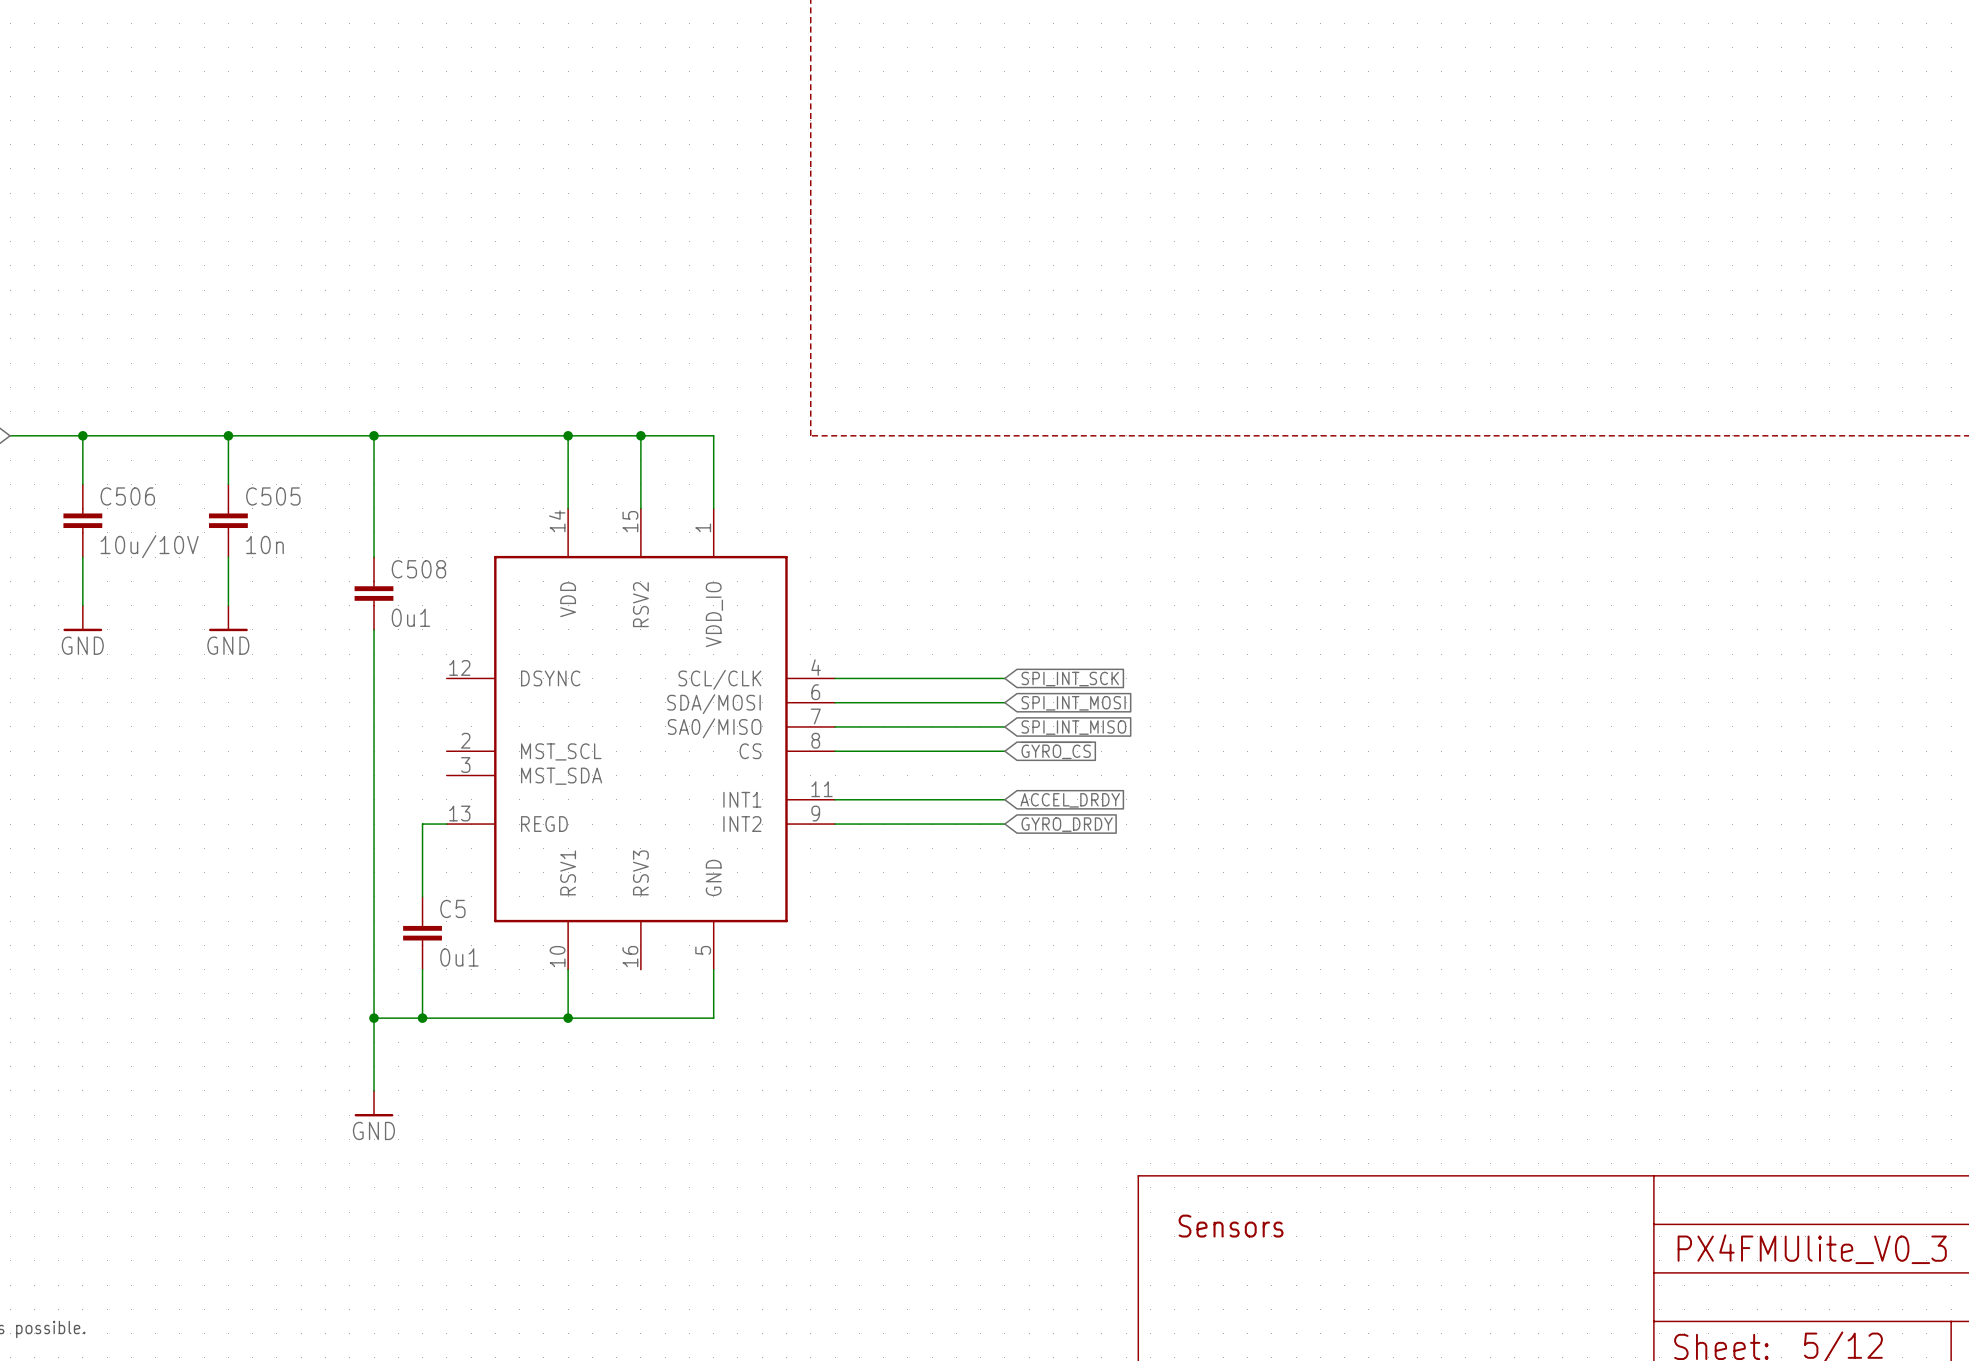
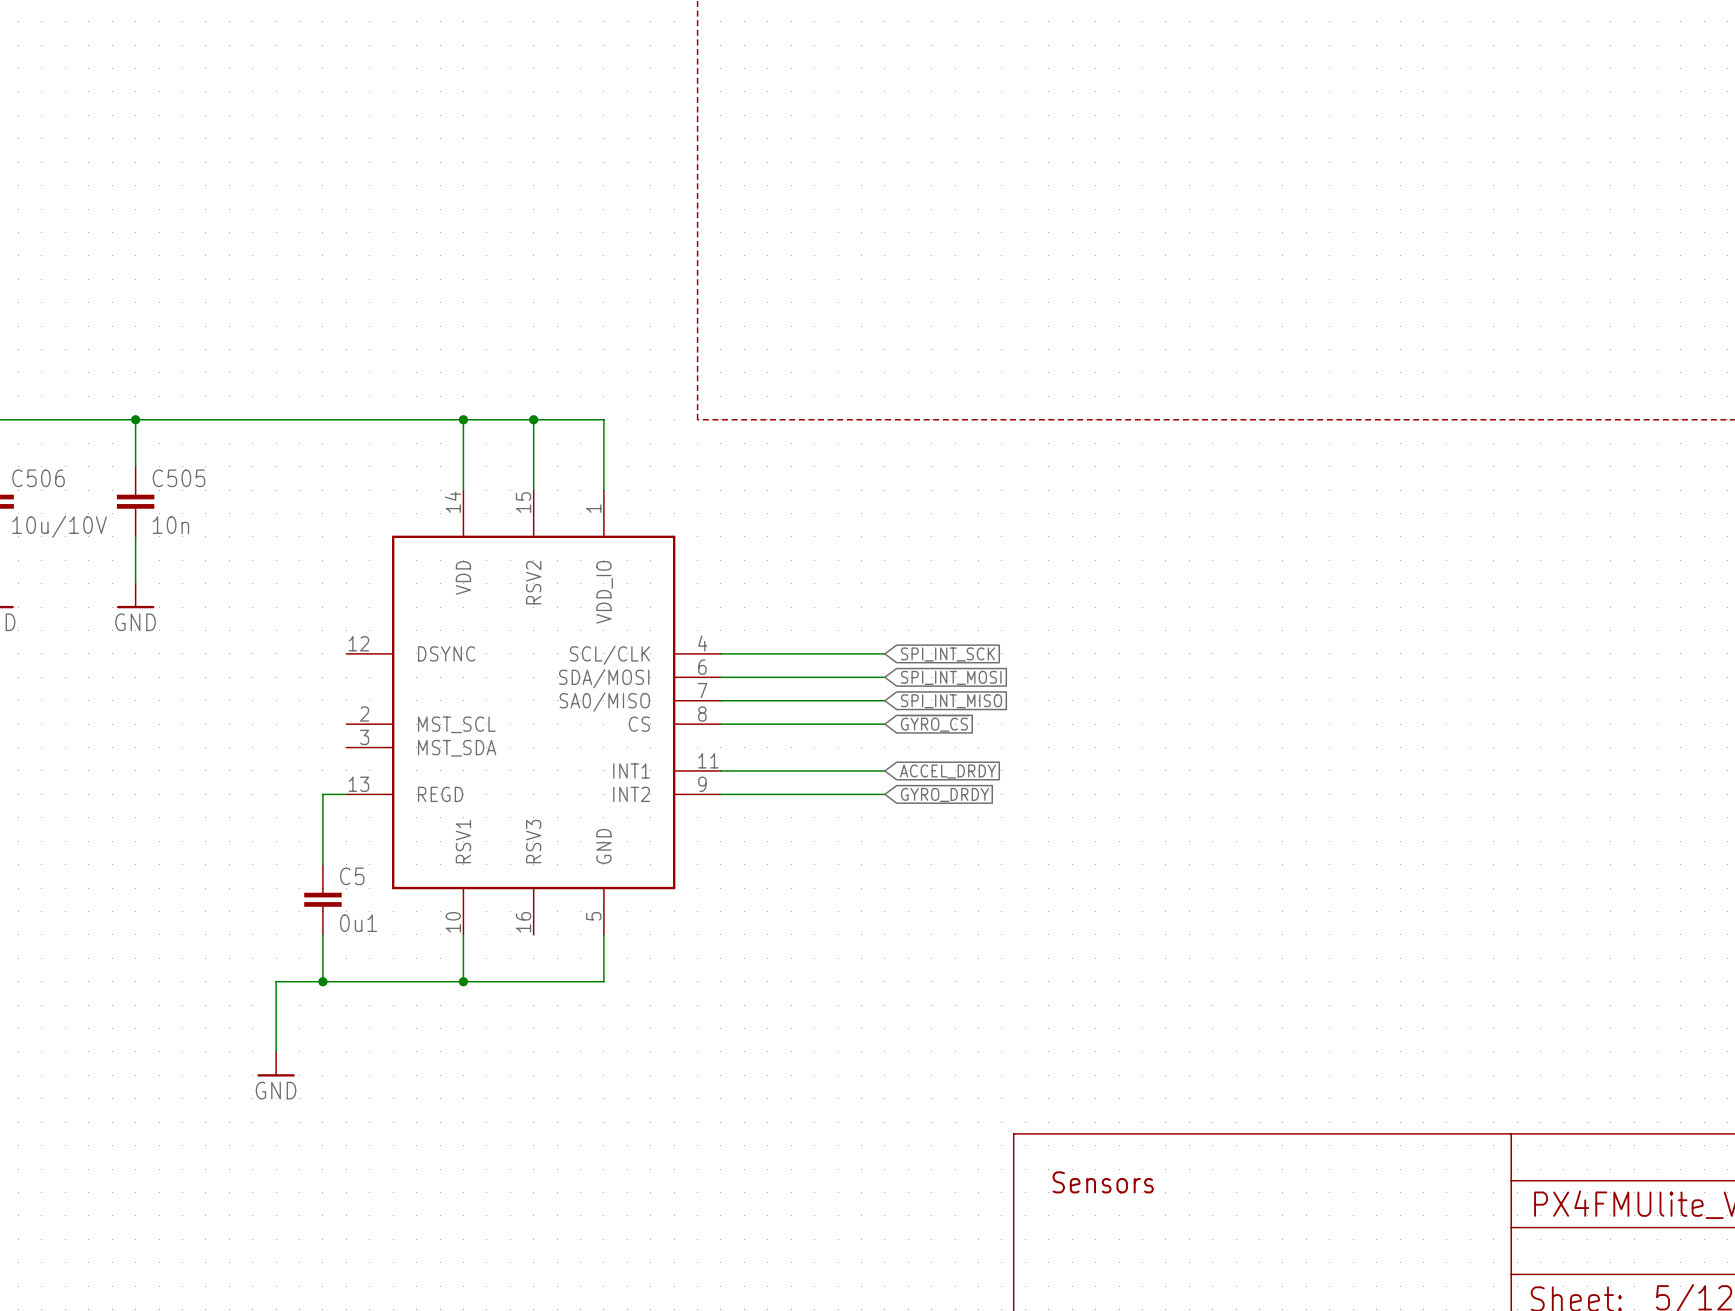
wire: (374, 435) (374, 557) -> none
junction: (374, 435) -> none
C508: 0u1 (374, 593) -> none
wire: (374, 629) (374, 1018) -> none
junction: (374, 1018) -> none

